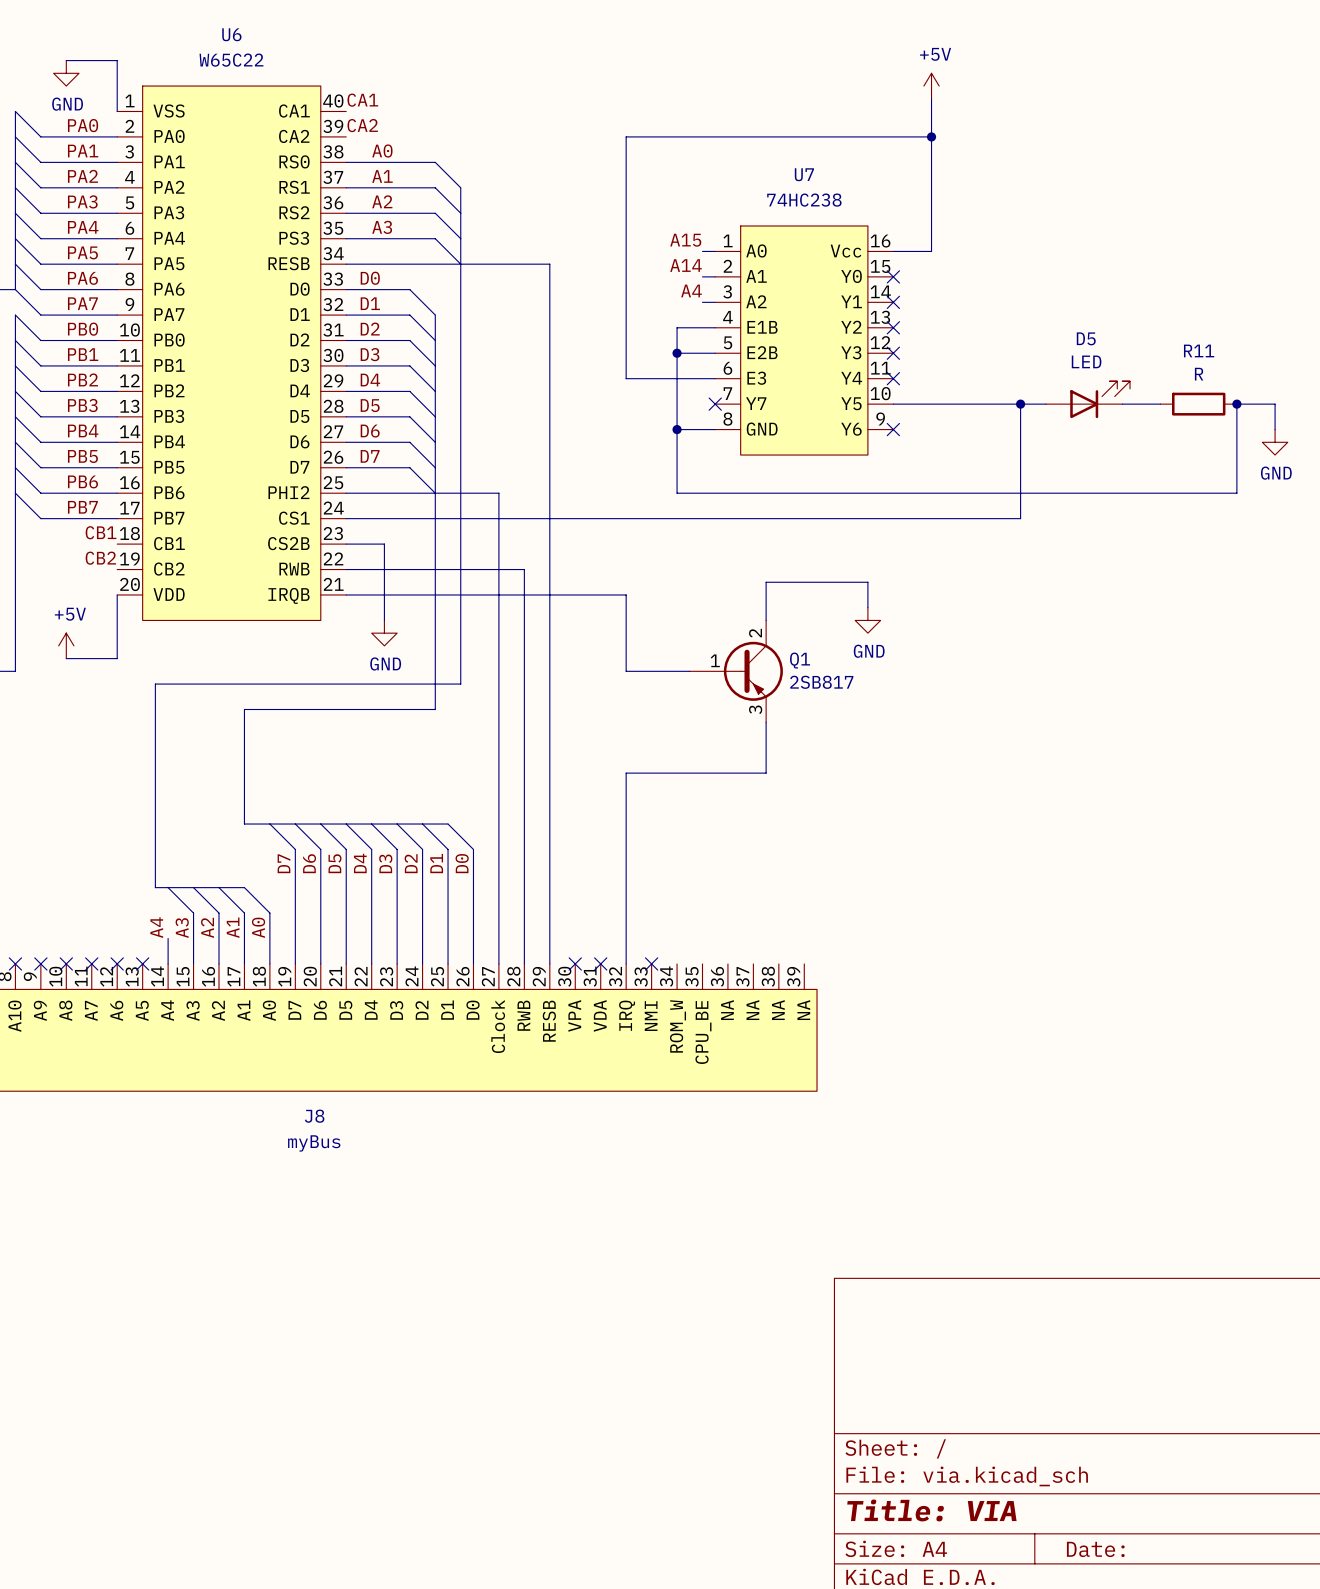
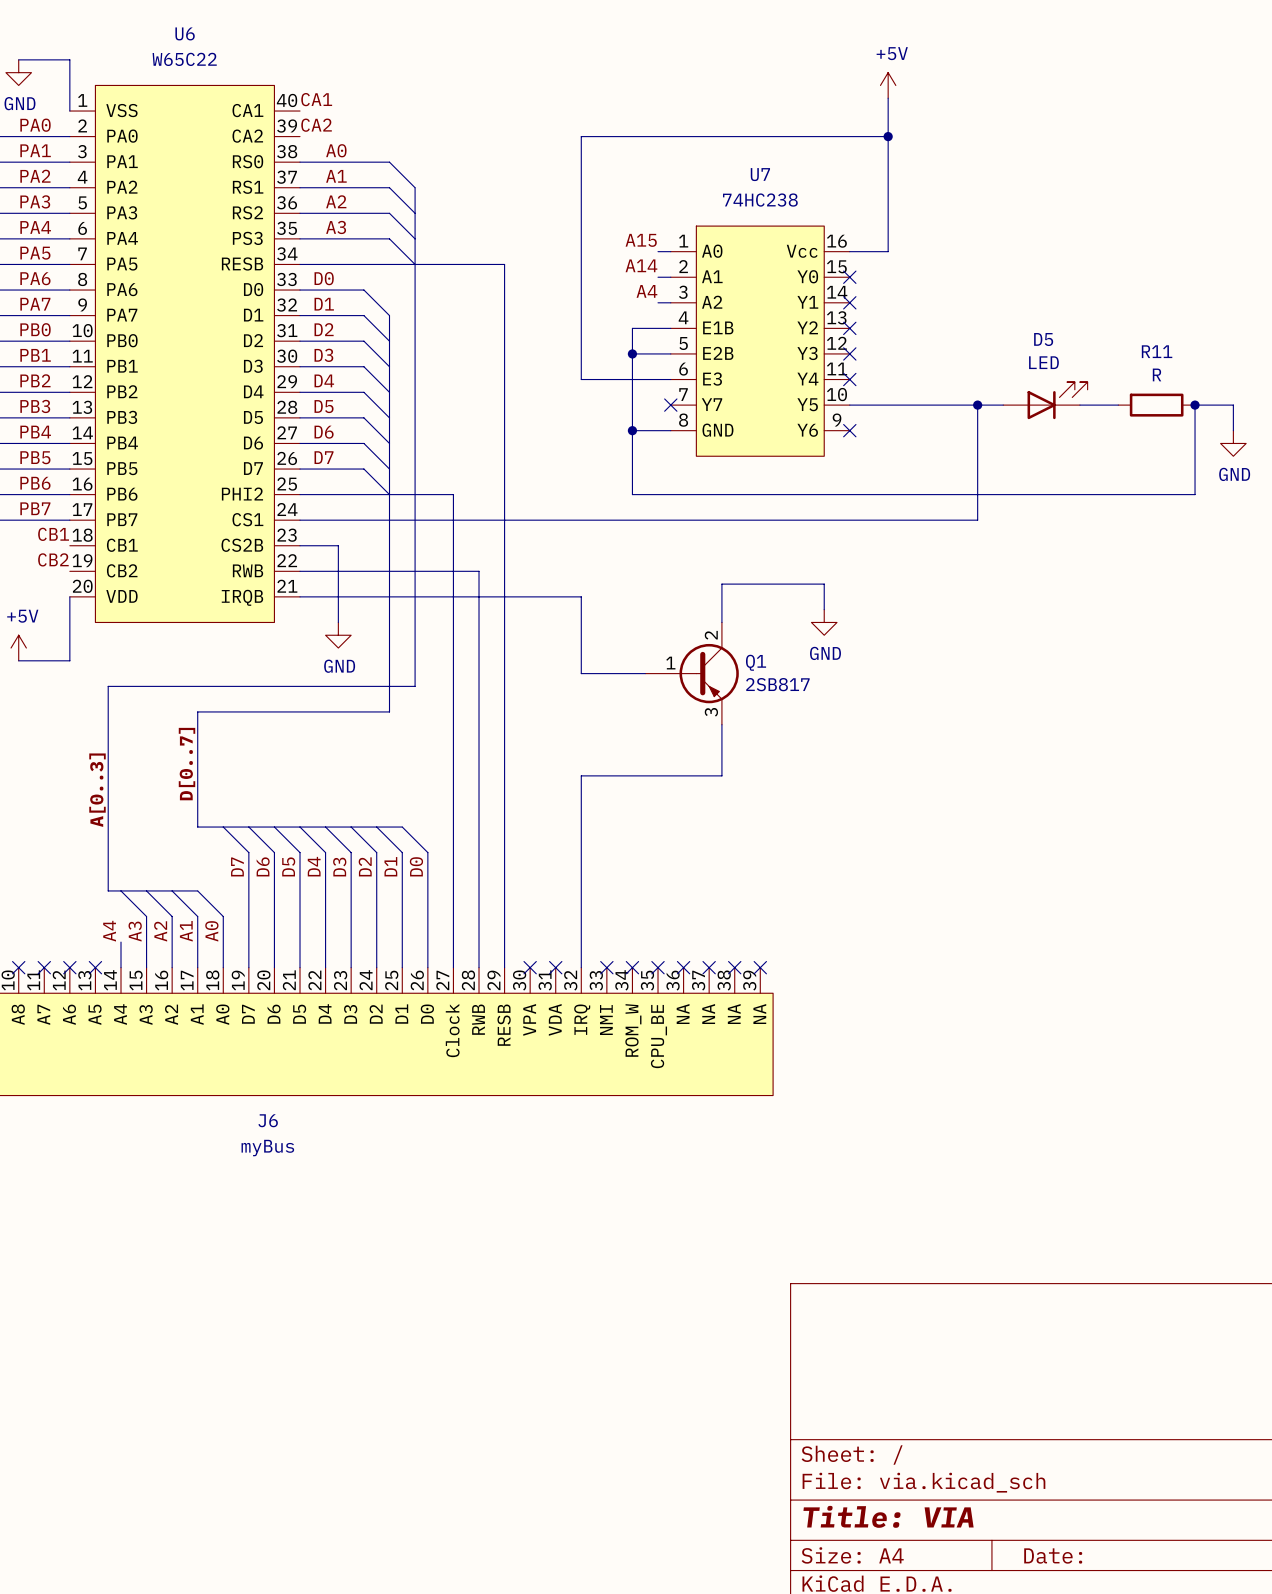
label: none -> D[0..7] (187, 764)
label: none -> A[0..3] (97, 790)
no-connect mark: none -> (632, 967)
no-connect mark: none -> (658, 967)
no-connect mark: none -> (683, 967)
no-connect mark: none -> (709, 967)
no-connect mark: none -> (734, 967)
no-connect mark: none -> (760, 967)
J8 name: J8 (314, 1116) -> J6 (268, 1120)

